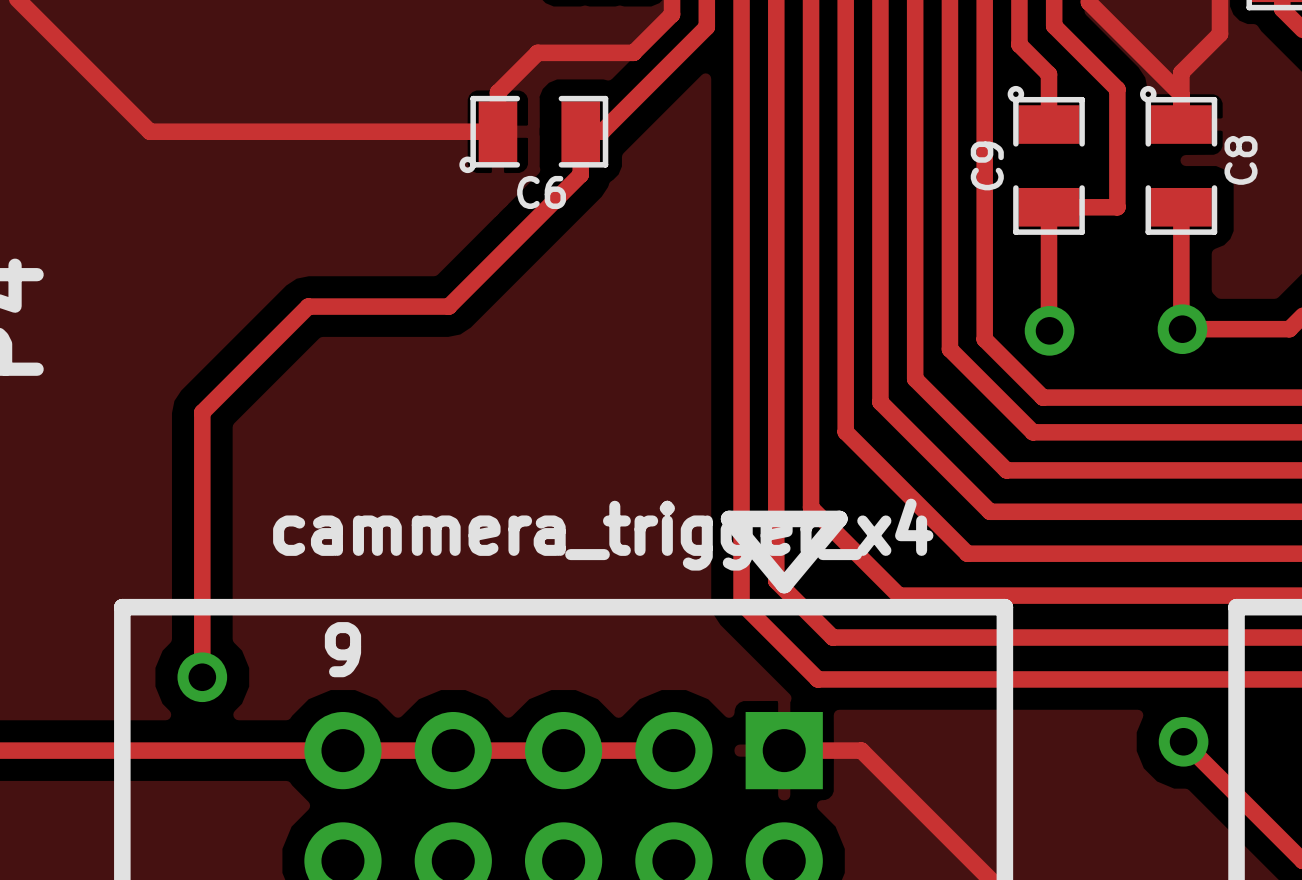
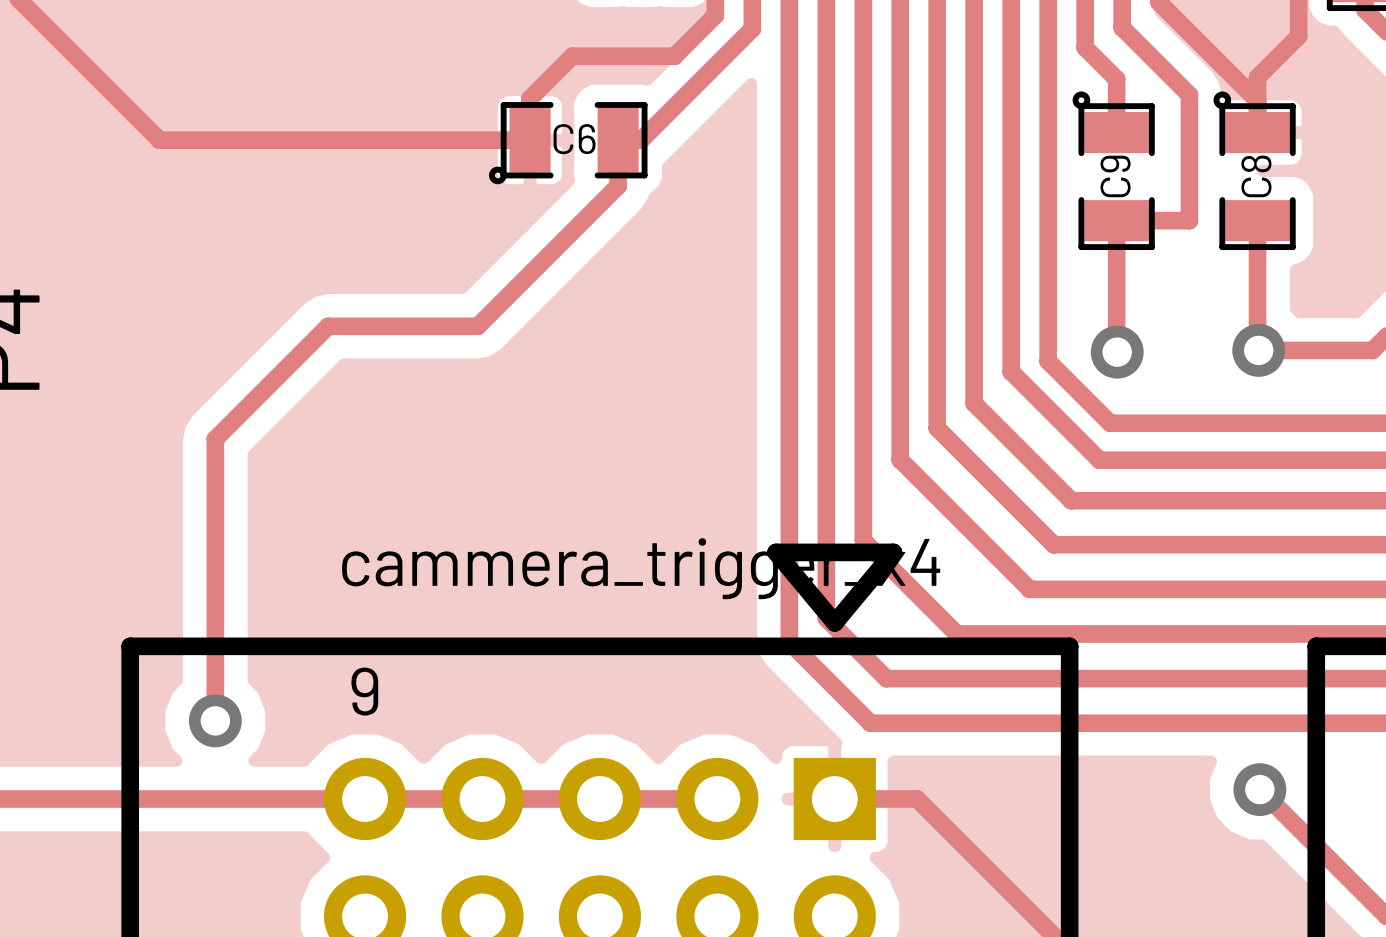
C8 name position: C8 (1241, 160) -> C8 (1256, 176)
C9 name position: C9 (987, 165) -> C9 (1115, 176)
C6 name position: C6 (541, 192) -> C6 (574, 139)

